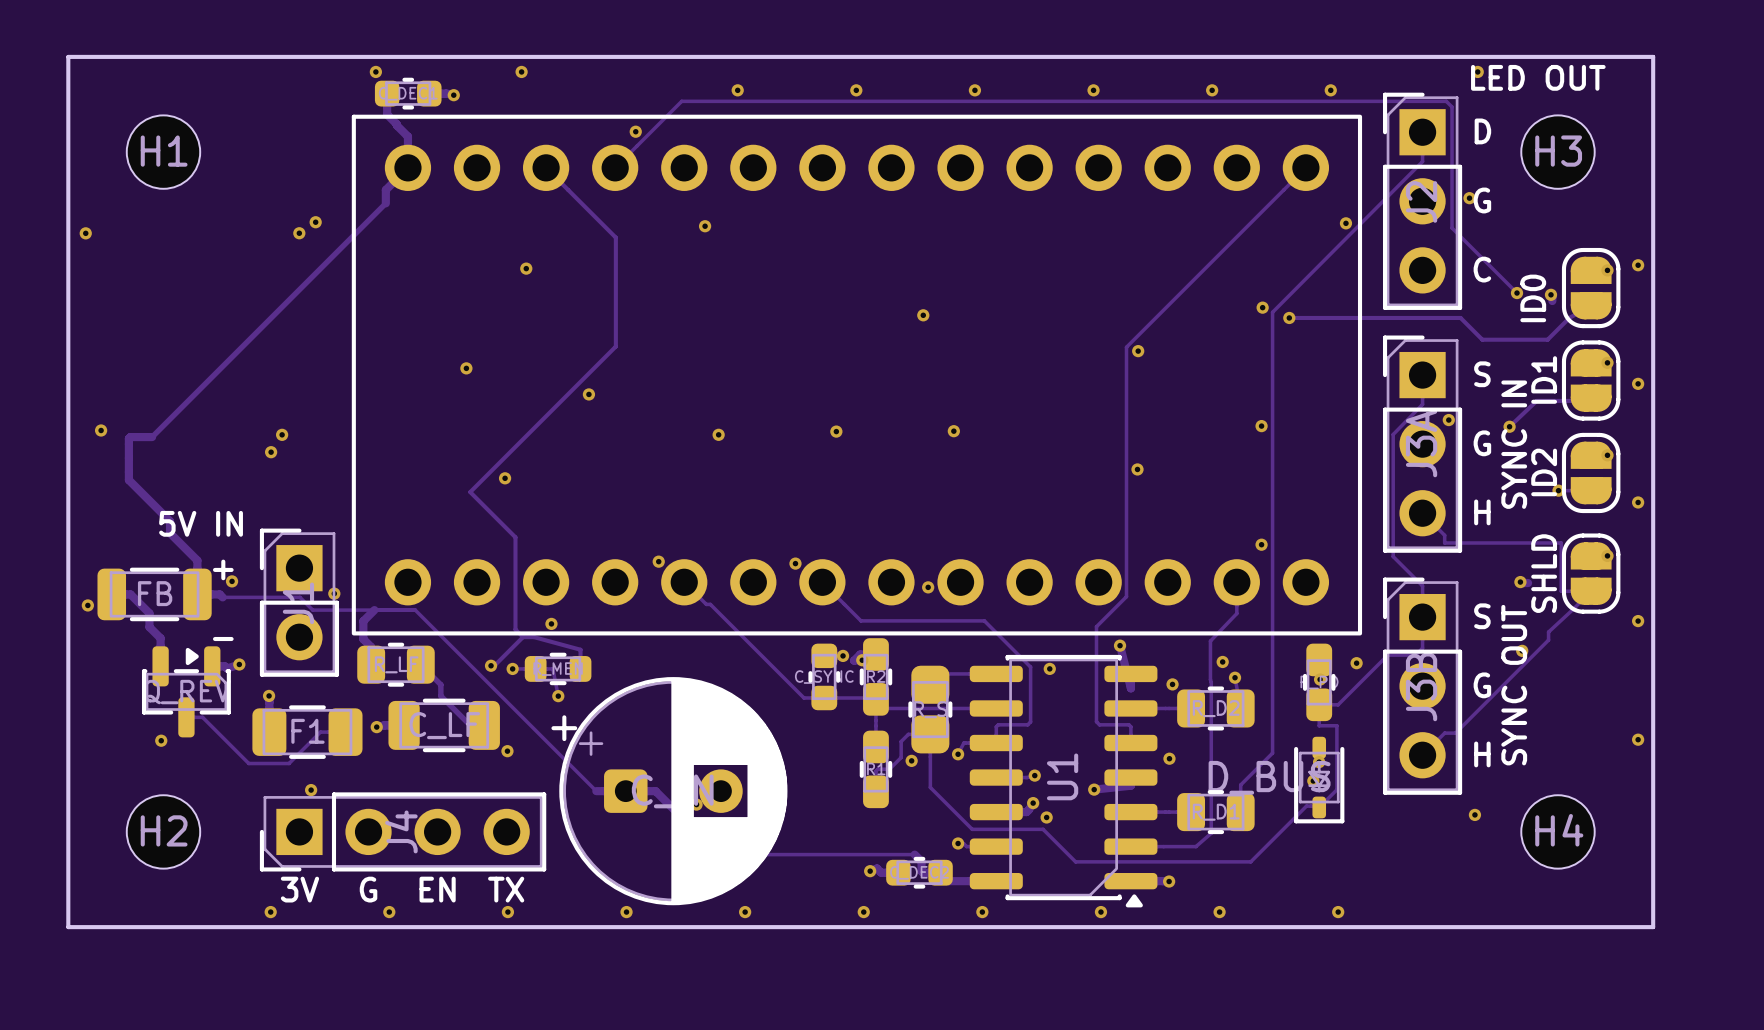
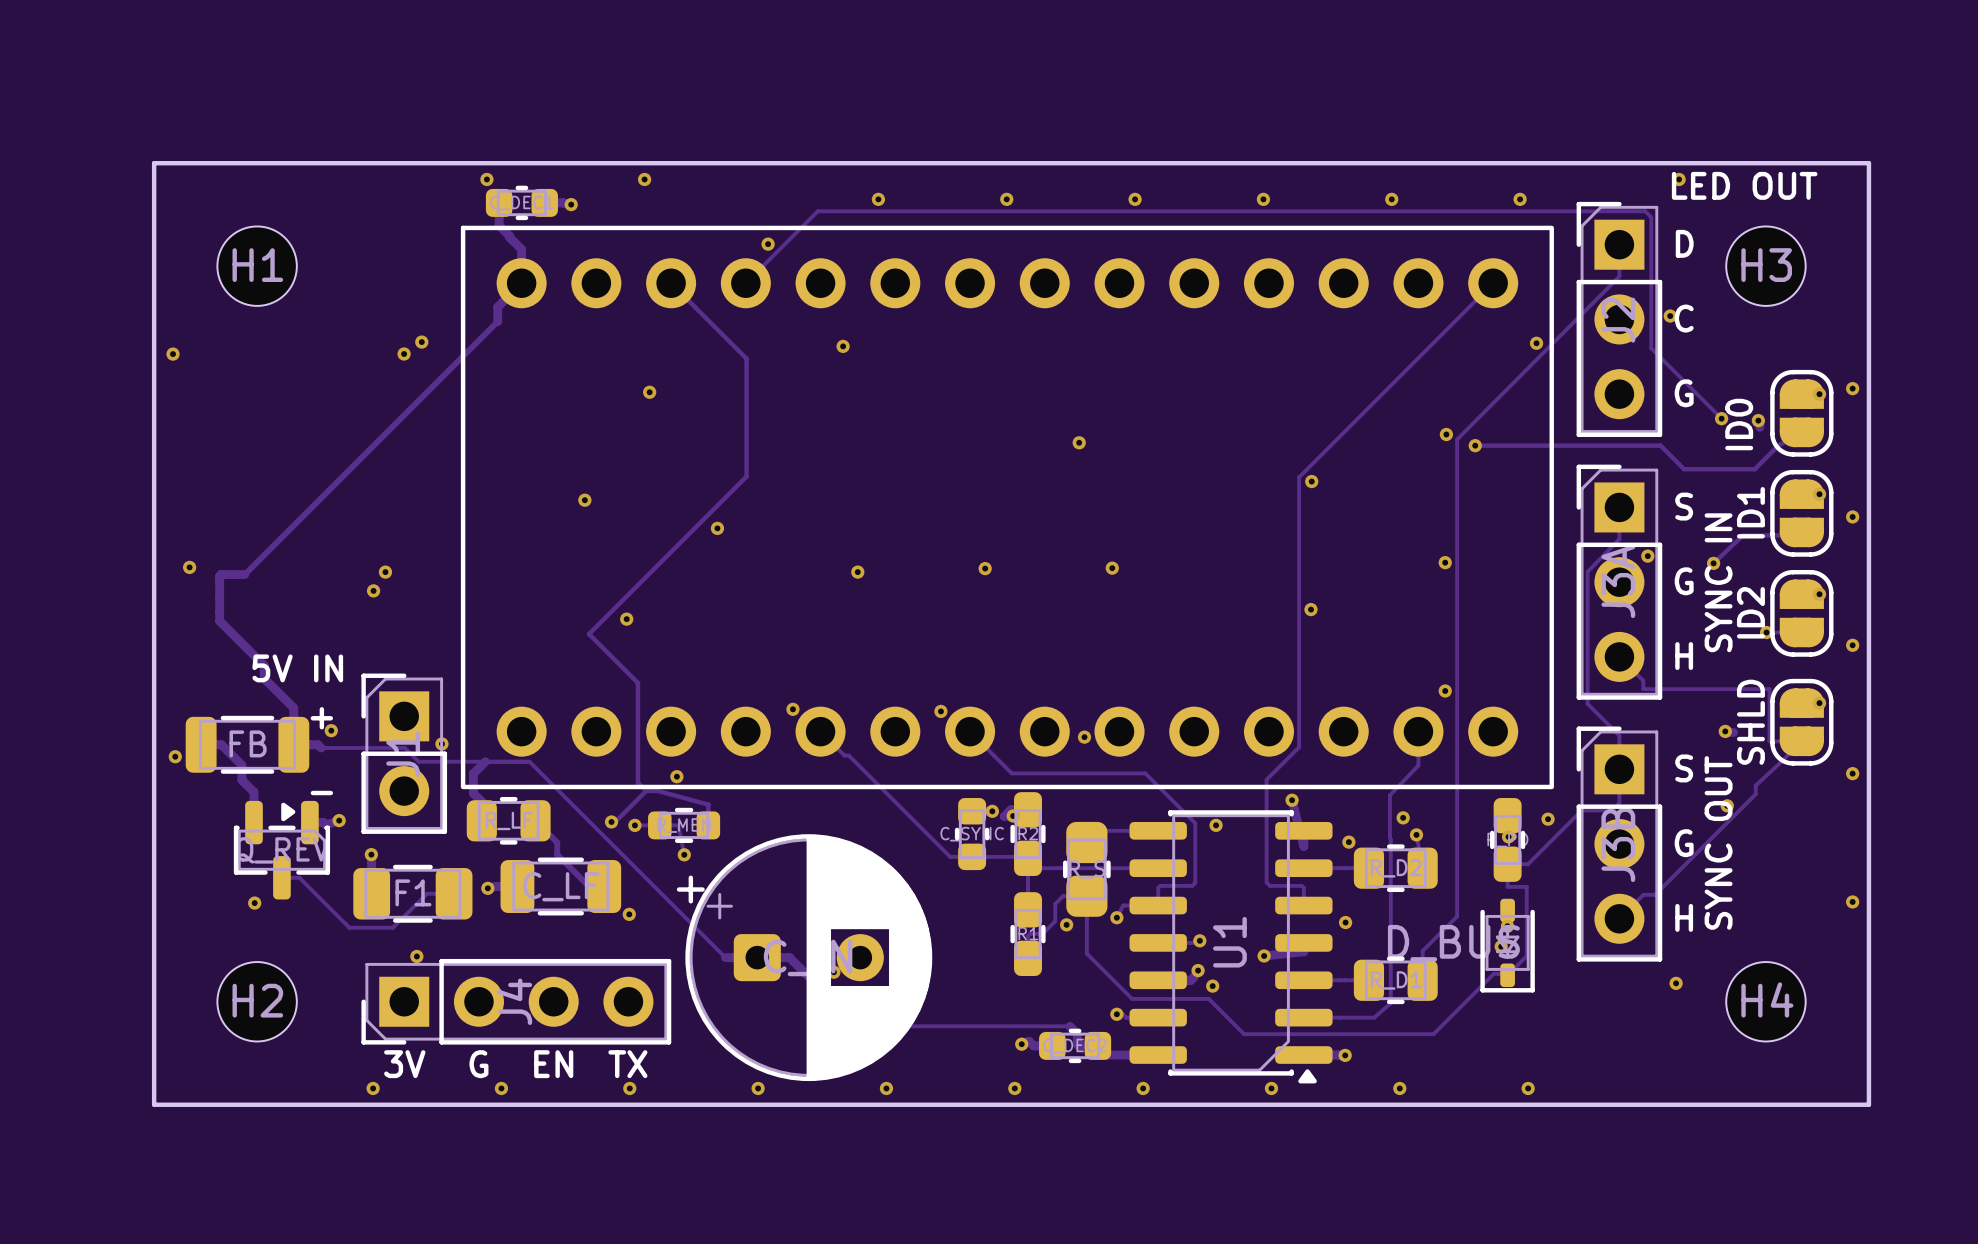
text: G (1482, 200) -> C (1684, 318)
text: C (1482, 269) -> G (1684, 393)

